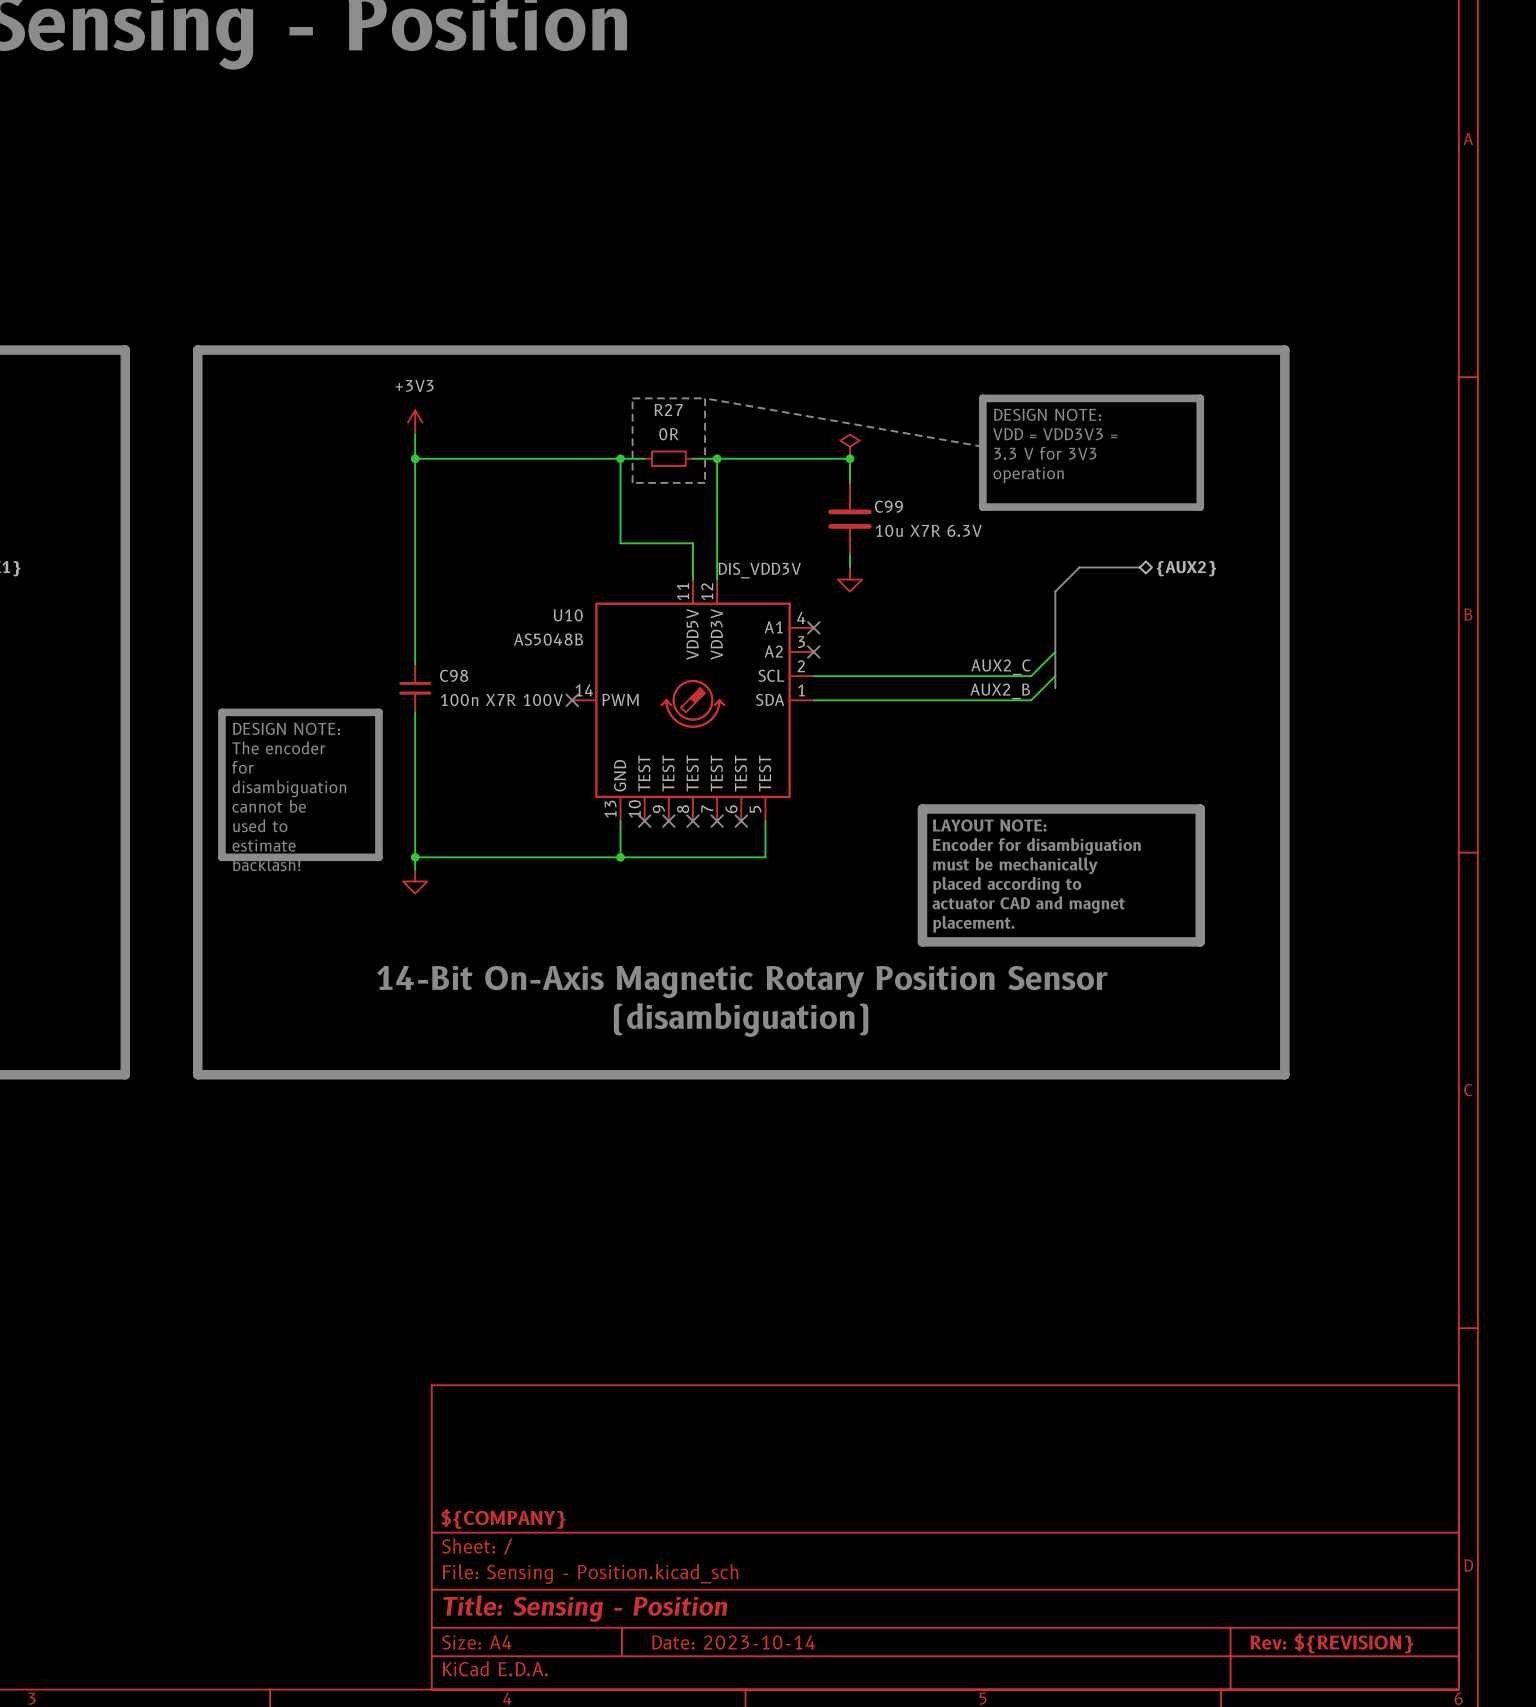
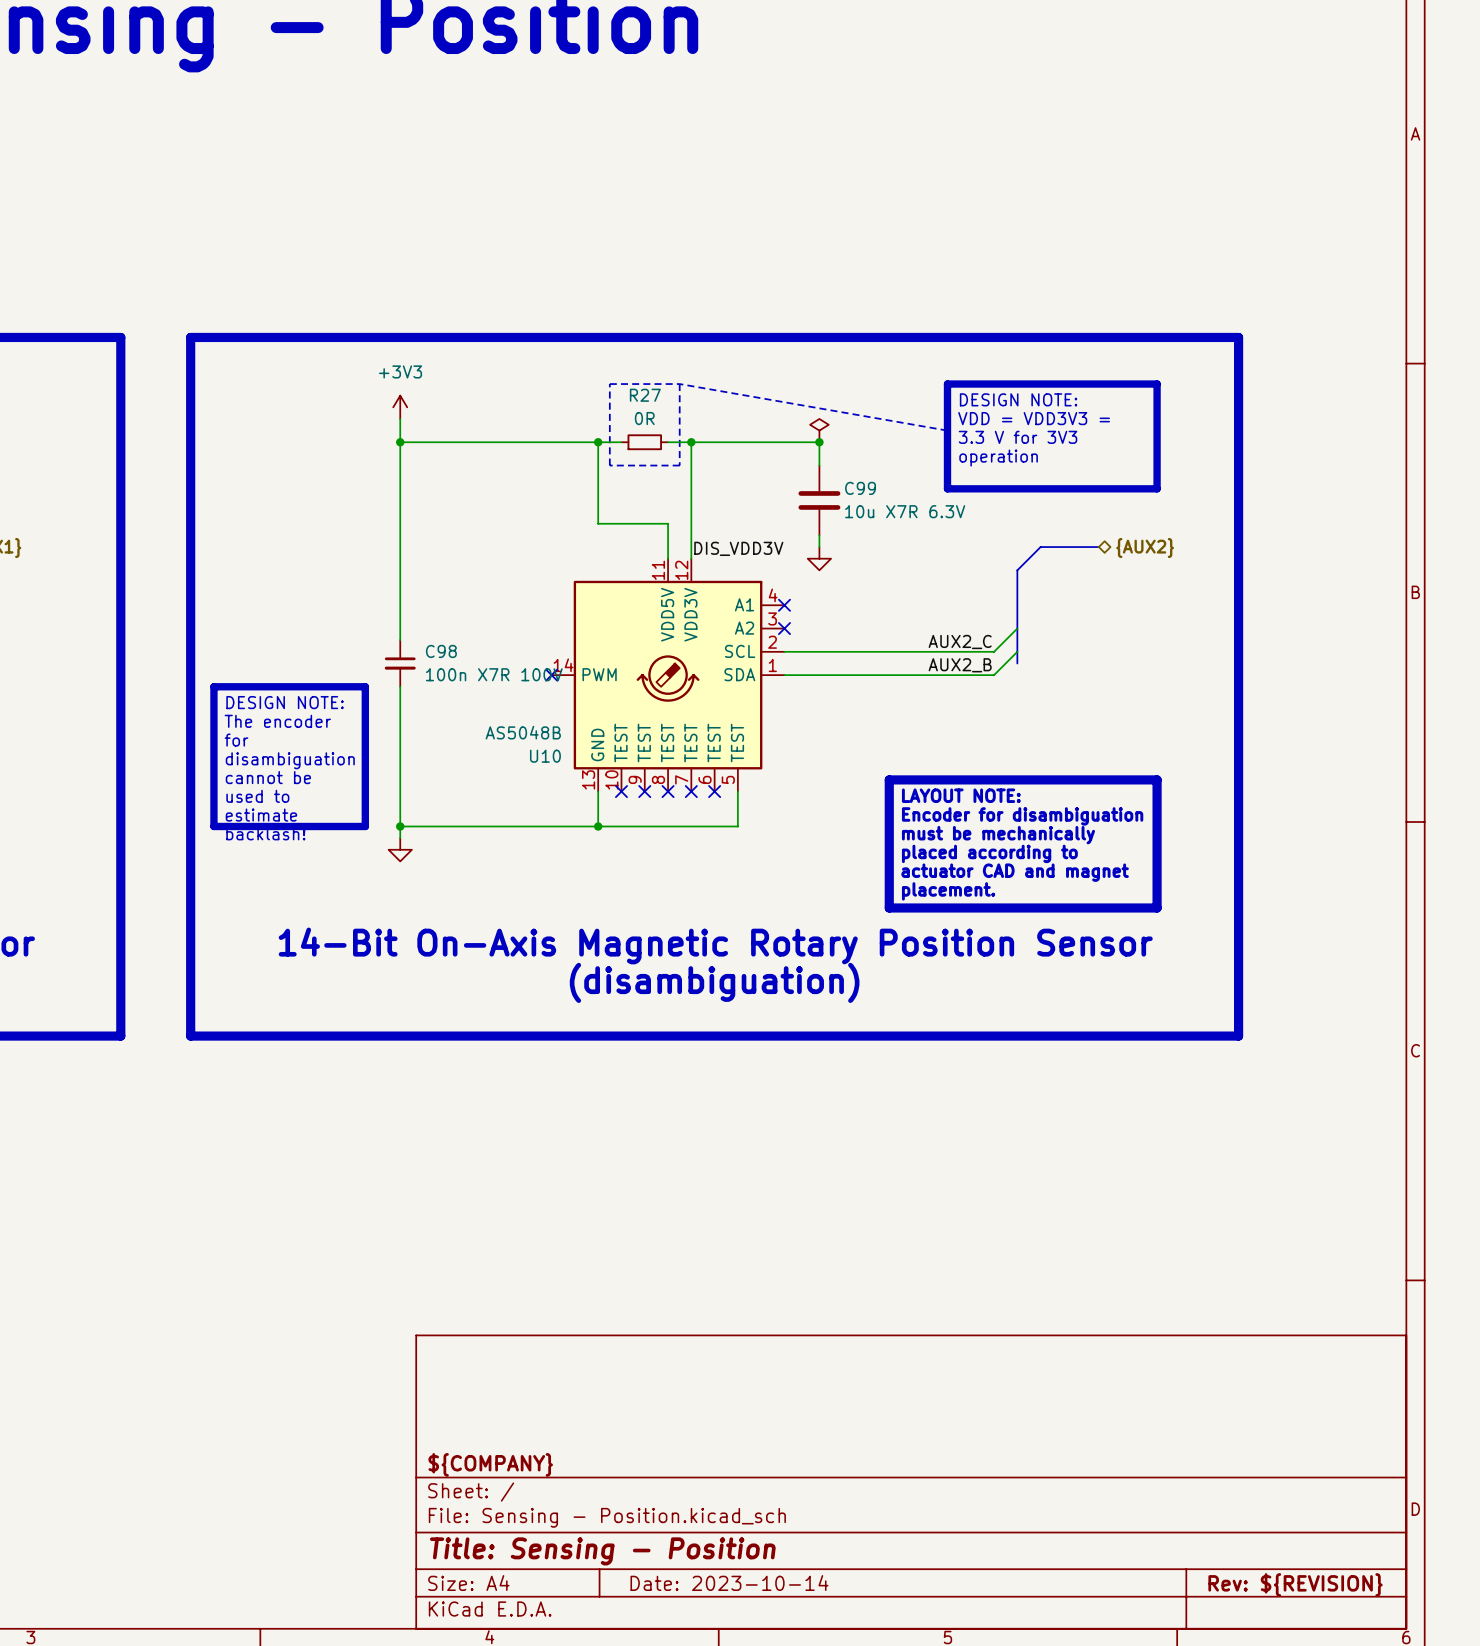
U10 name position: U10 (568, 615) -> U10 (545, 756)
U10 value position: AS5048B (548, 639) -> AS5048B (523, 732)

